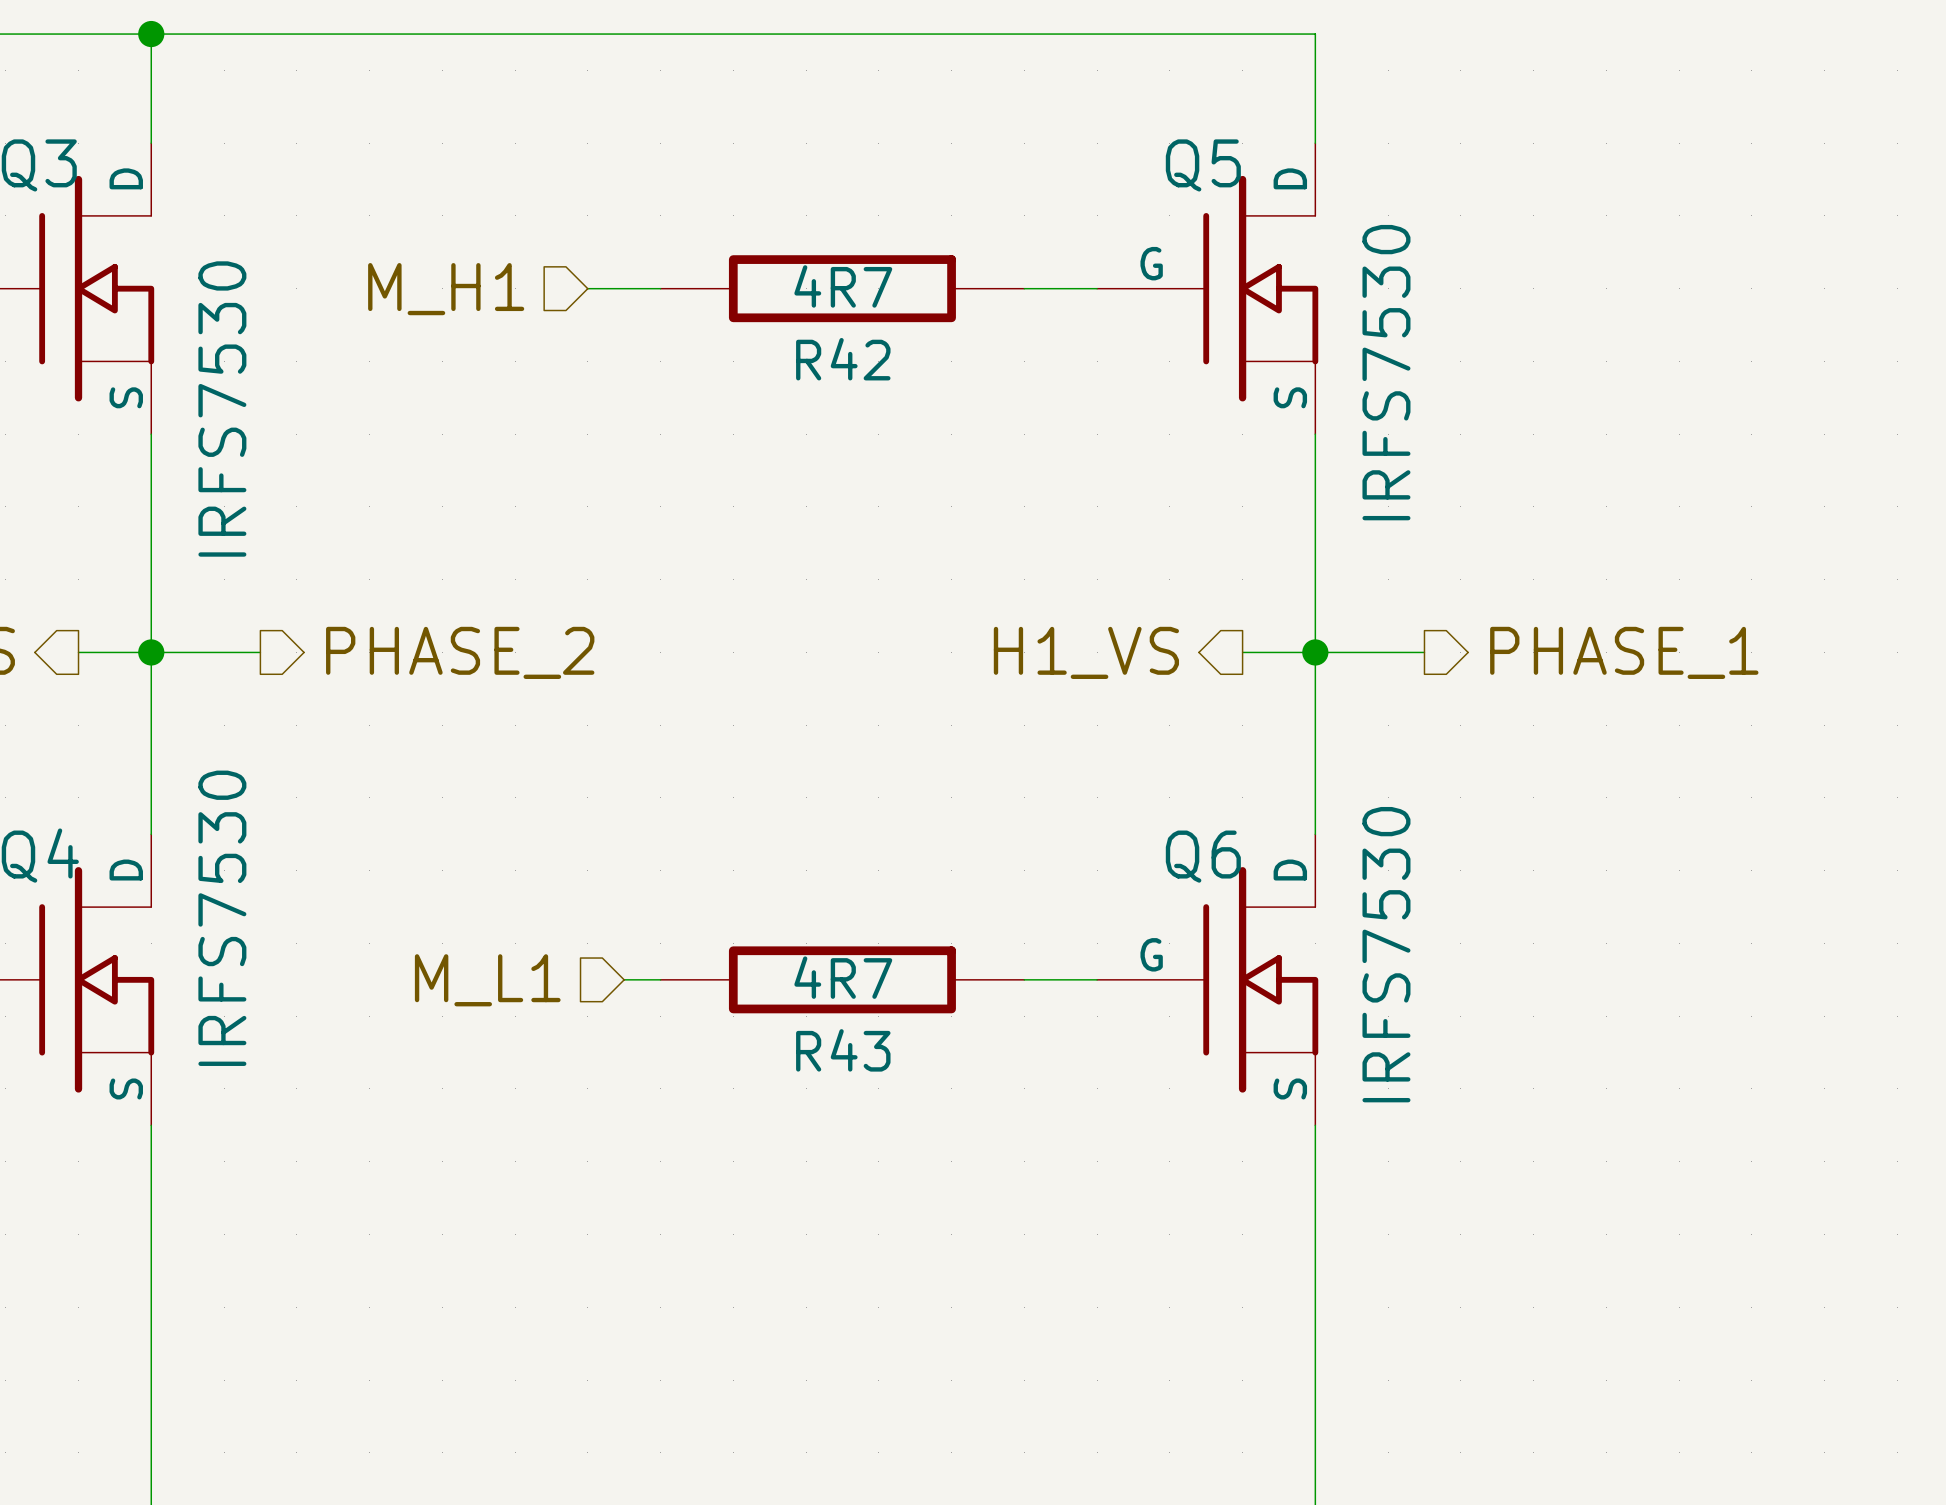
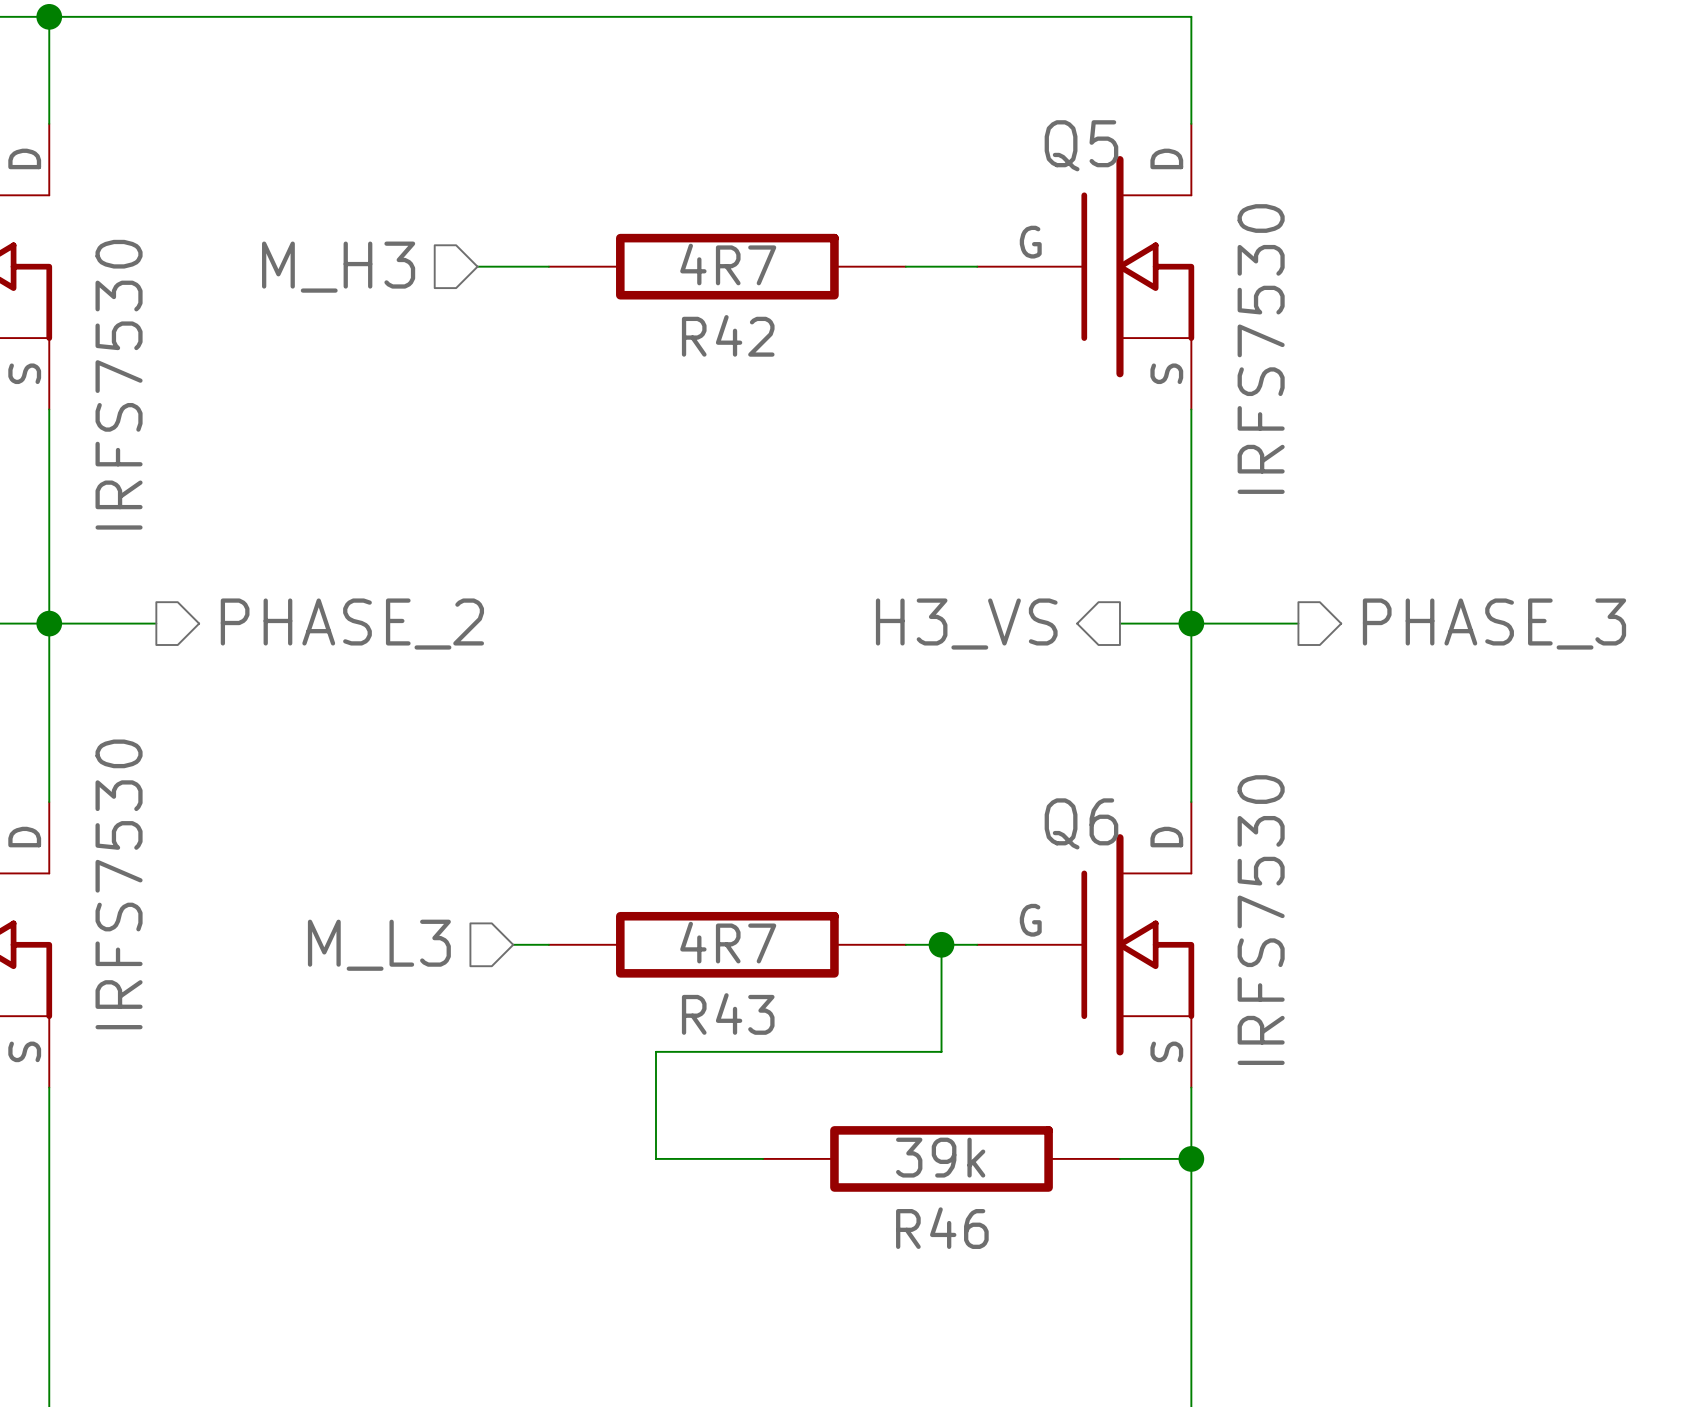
hierarchical label: M_H1 (446, 289) -> M_H3 (338, 267)
hierarchical label: H1_VS (1086, 652) -> H3_VS (966, 624)
hierarchical label: PHASE_1 (1624, 652) -> PHASE_3 (1494, 624)
wire: none -> (941, 944) (941, 1051) (655, 1051) (655, 1158) (763, 1158)
junction: none -> (941, 944)
hierarchical label: M_L1 (487, 980) -> M_L3 (379, 945)
R46: none -> 39k (941, 1158)
wire: none -> (1119, 1158) (1191, 1158)
junction: none -> (1191, 1158)

